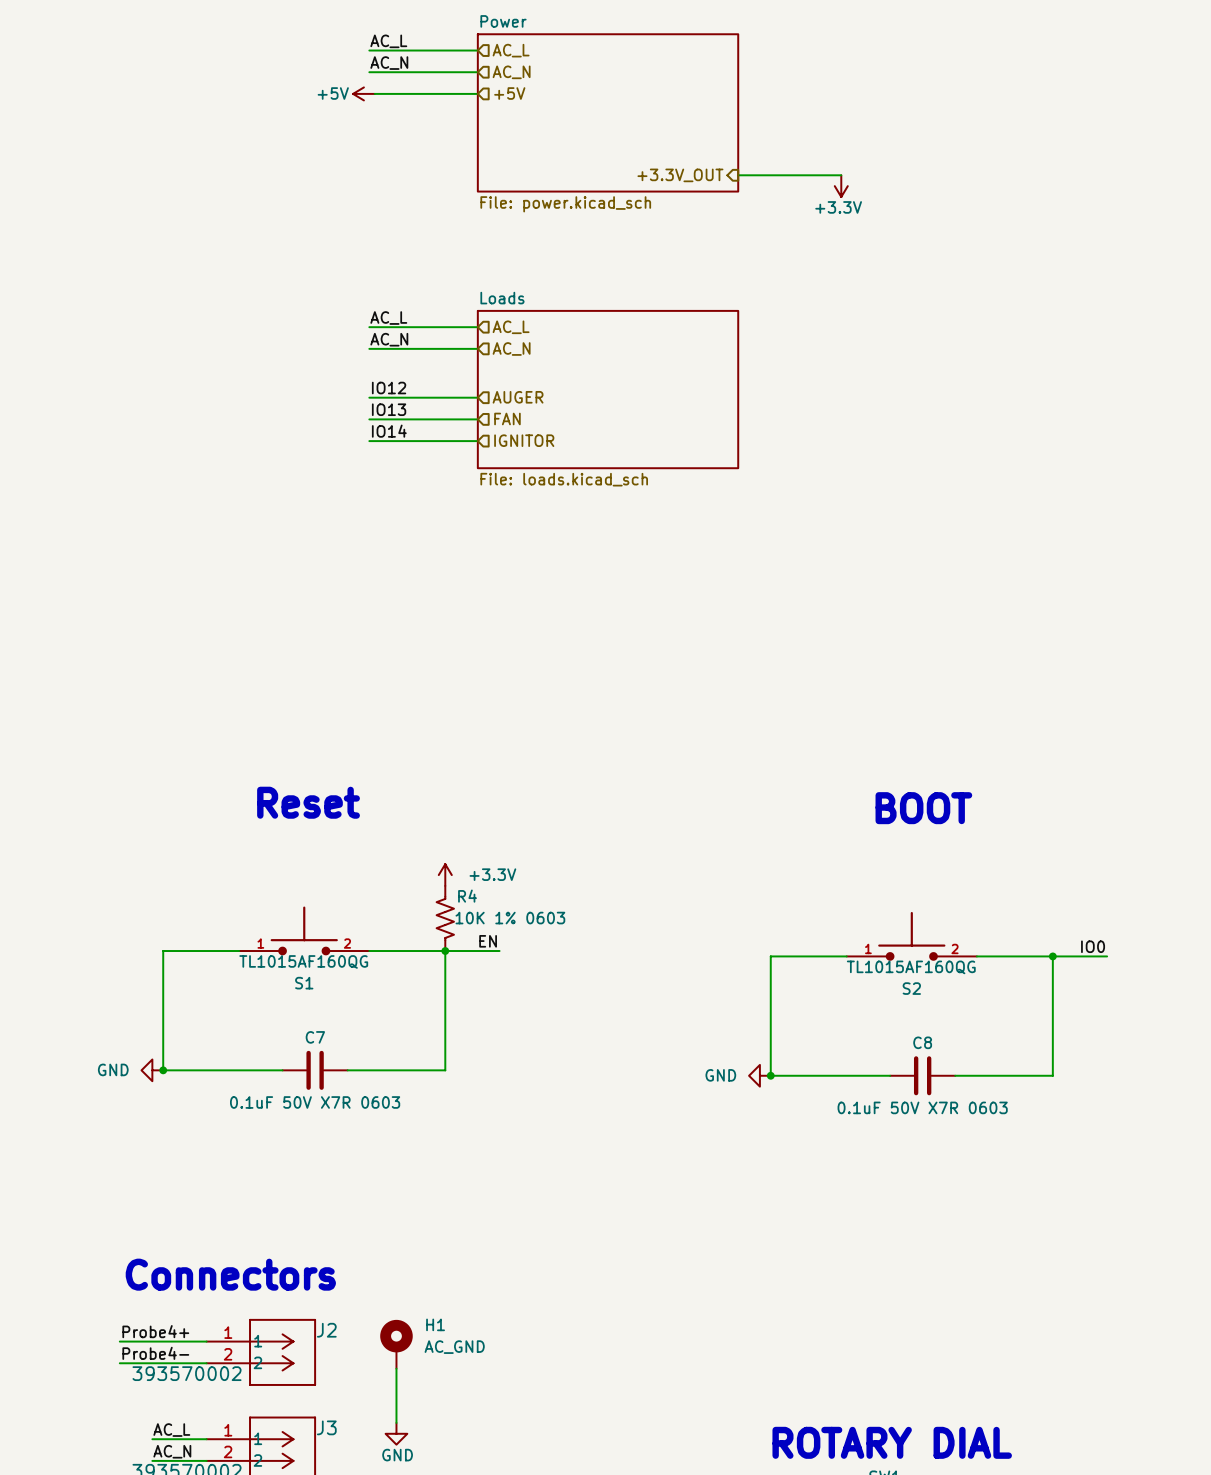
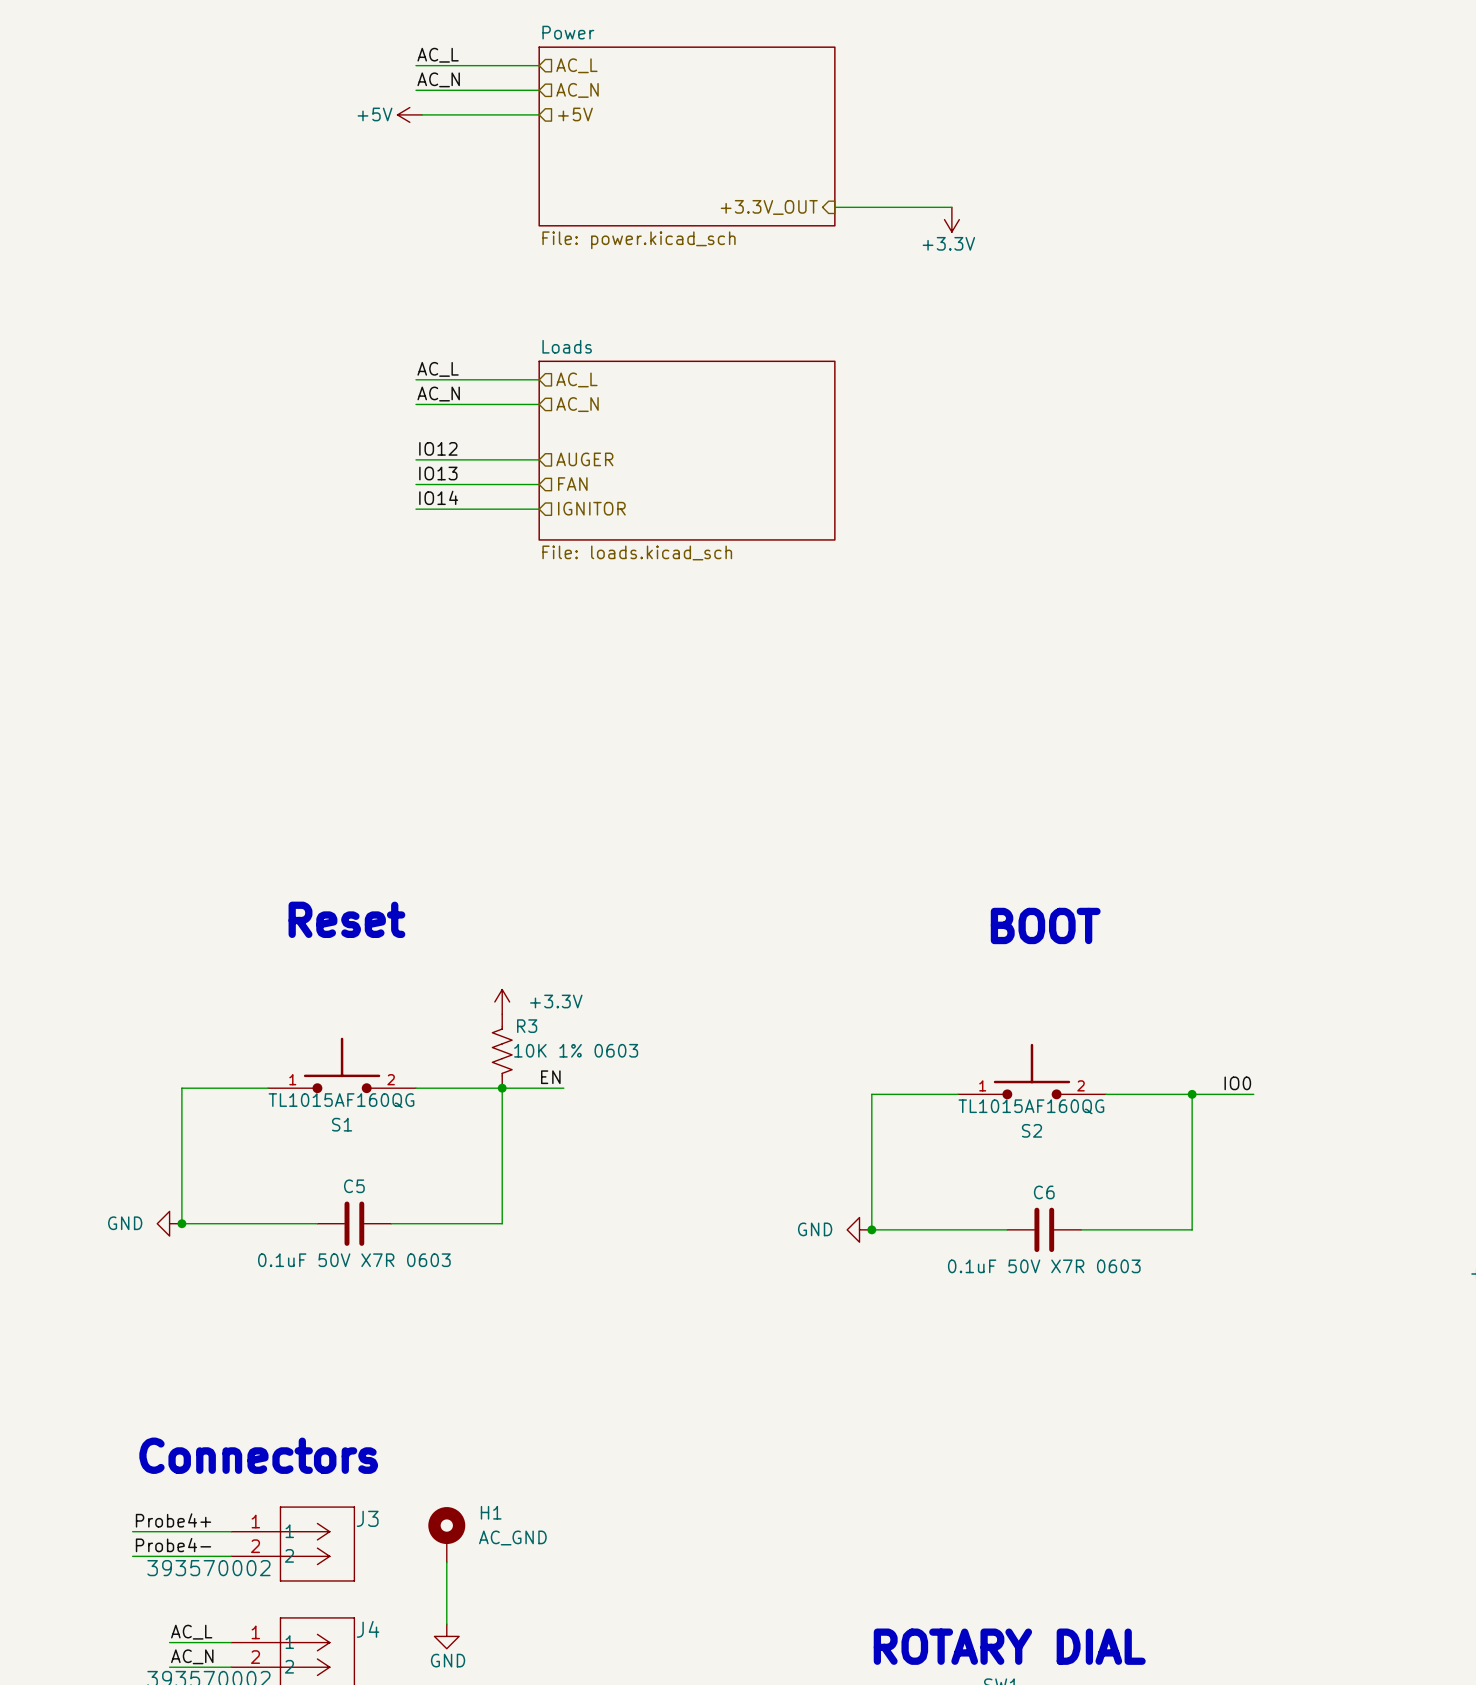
R4 name: R4 (467, 896) -> R3 (527, 1026)
C7 name: C7 (315, 1037) -> C5 (354, 1186)
C8 name: C8 (922, 1042) -> C6 (1044, 1192)
J2 name: J2 (326, 1330) -> J3 (367, 1518)
J3 name: J3 (326, 1427) -> J4 (368, 1629)

